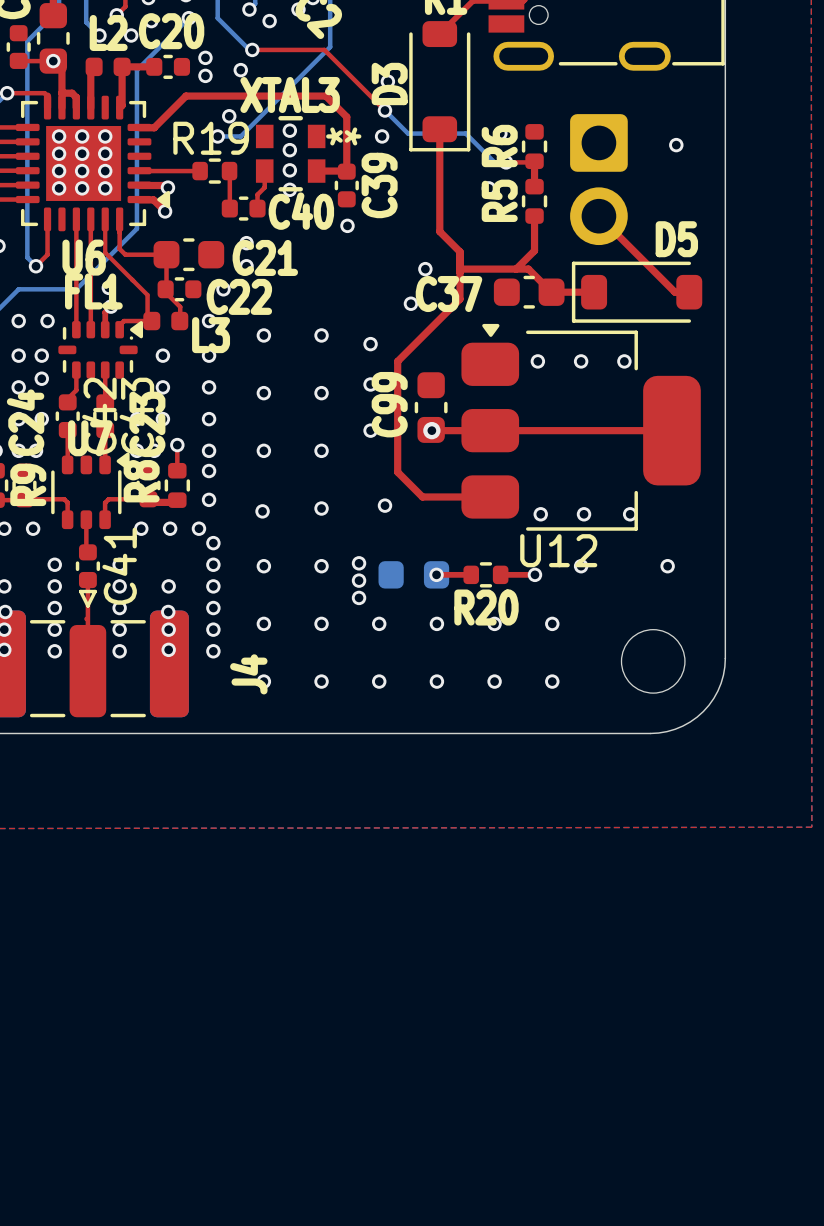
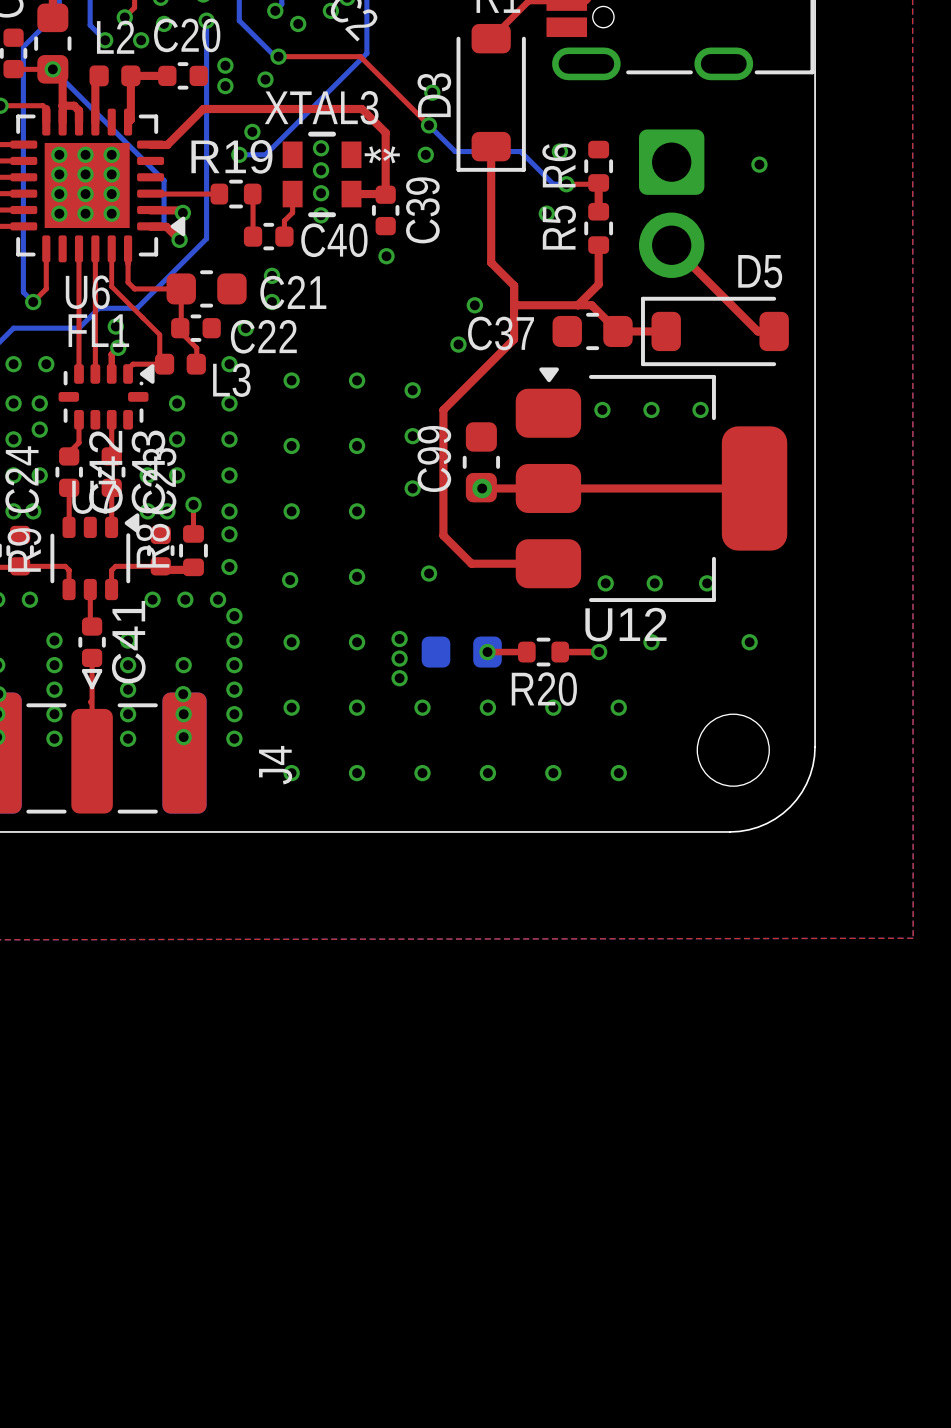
bottom track: (188, 18) (136, 70) (136, 228) (93, 271) -> (206, 20) (206, 238) (137, 308) (98, 308)
bottom track: none -> (52, 69) (164, 180) (164, 224) (179, 239)

